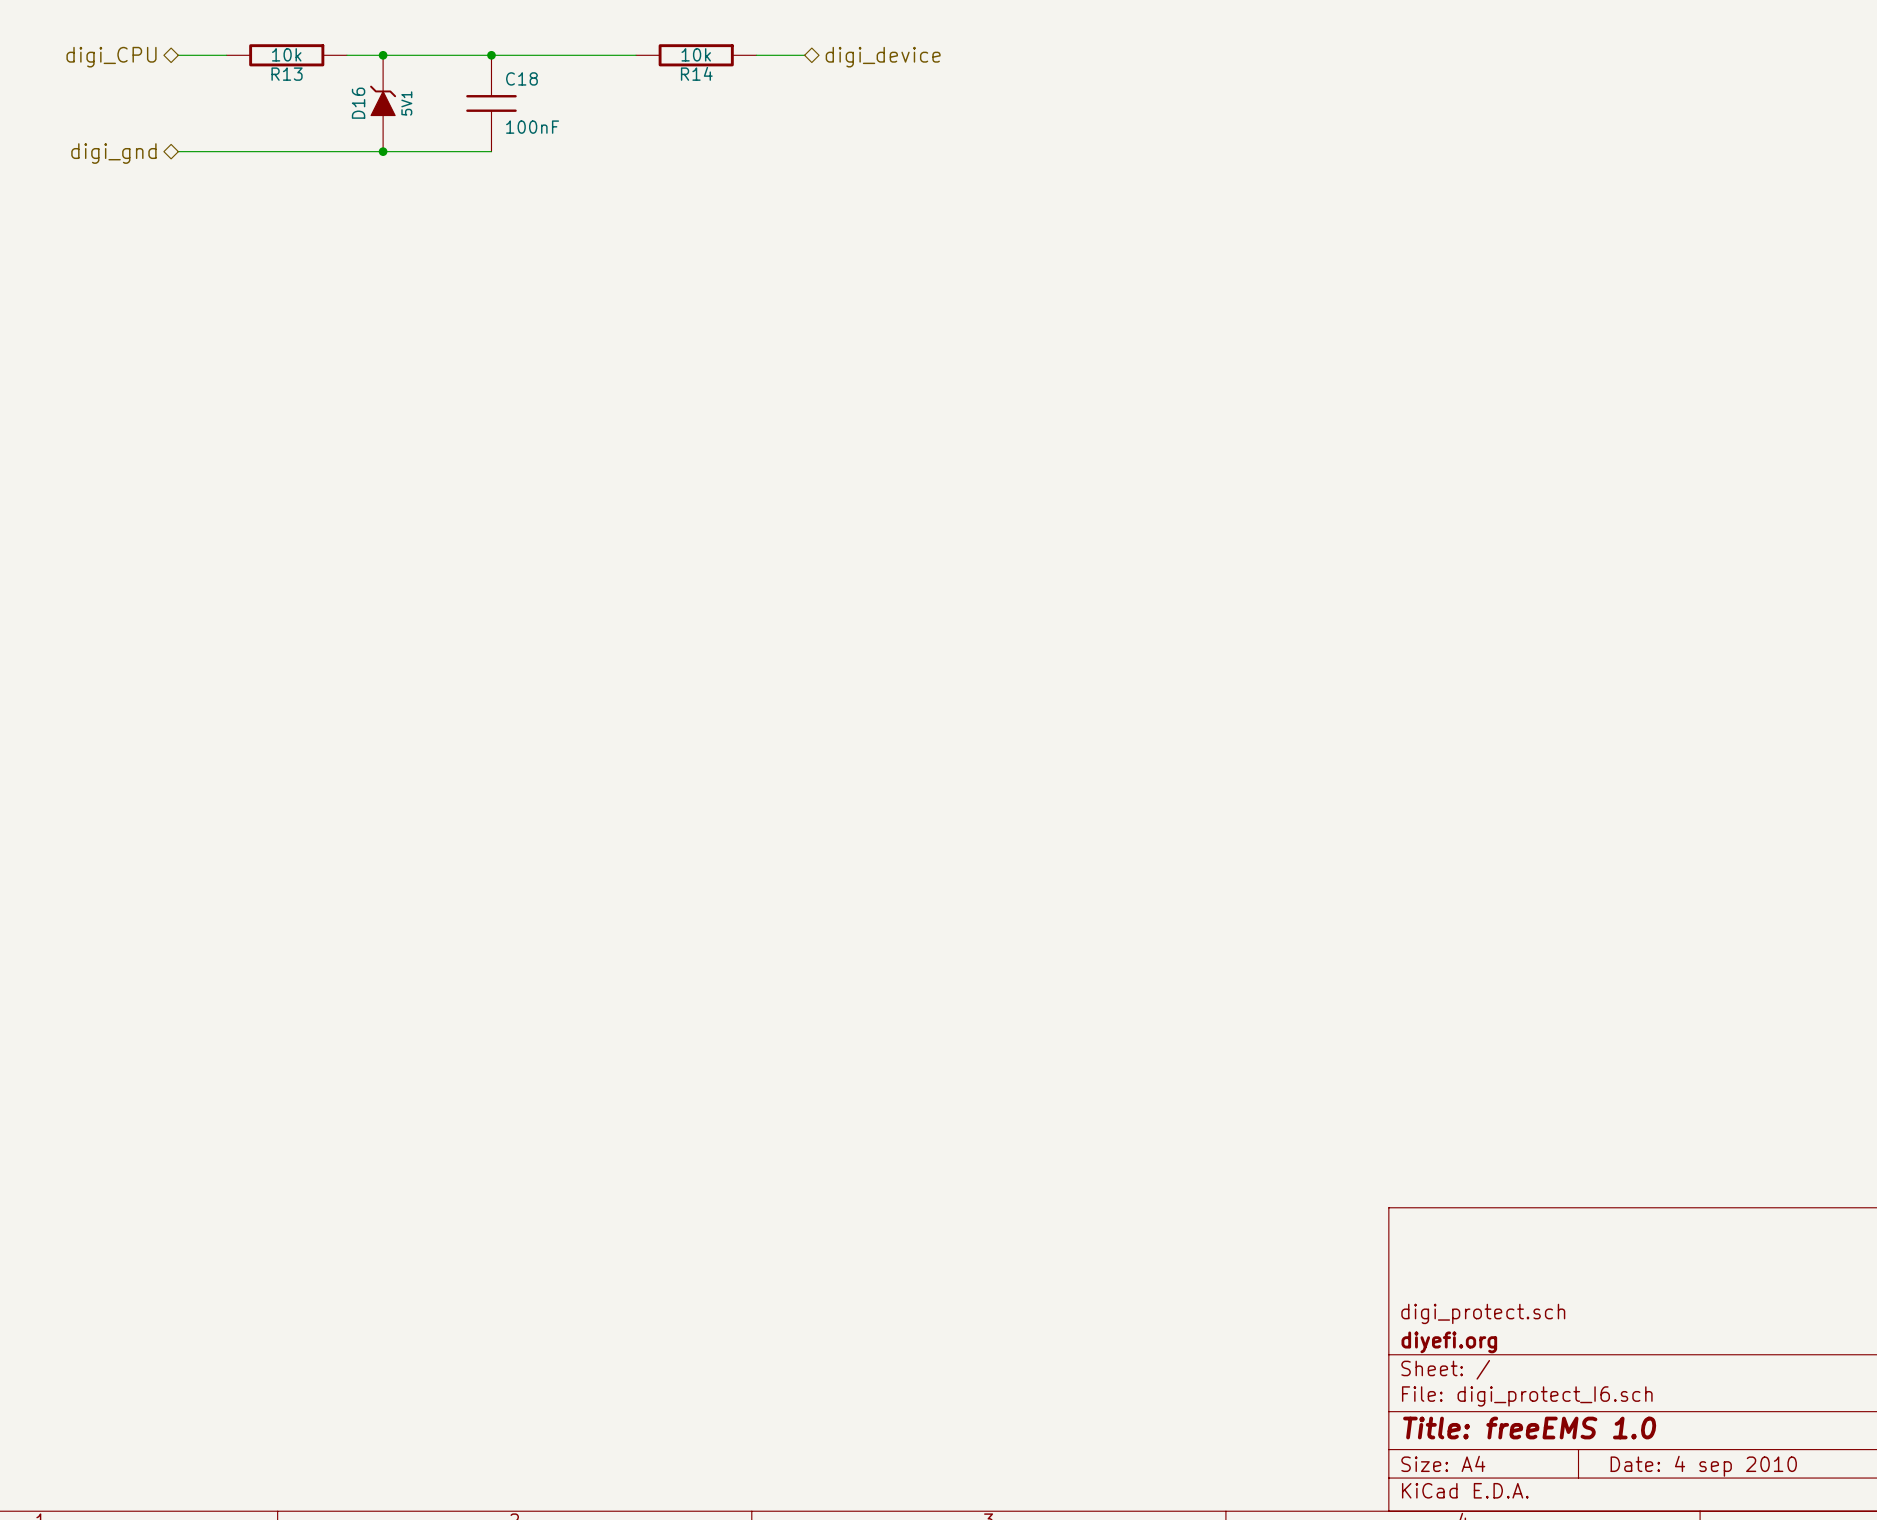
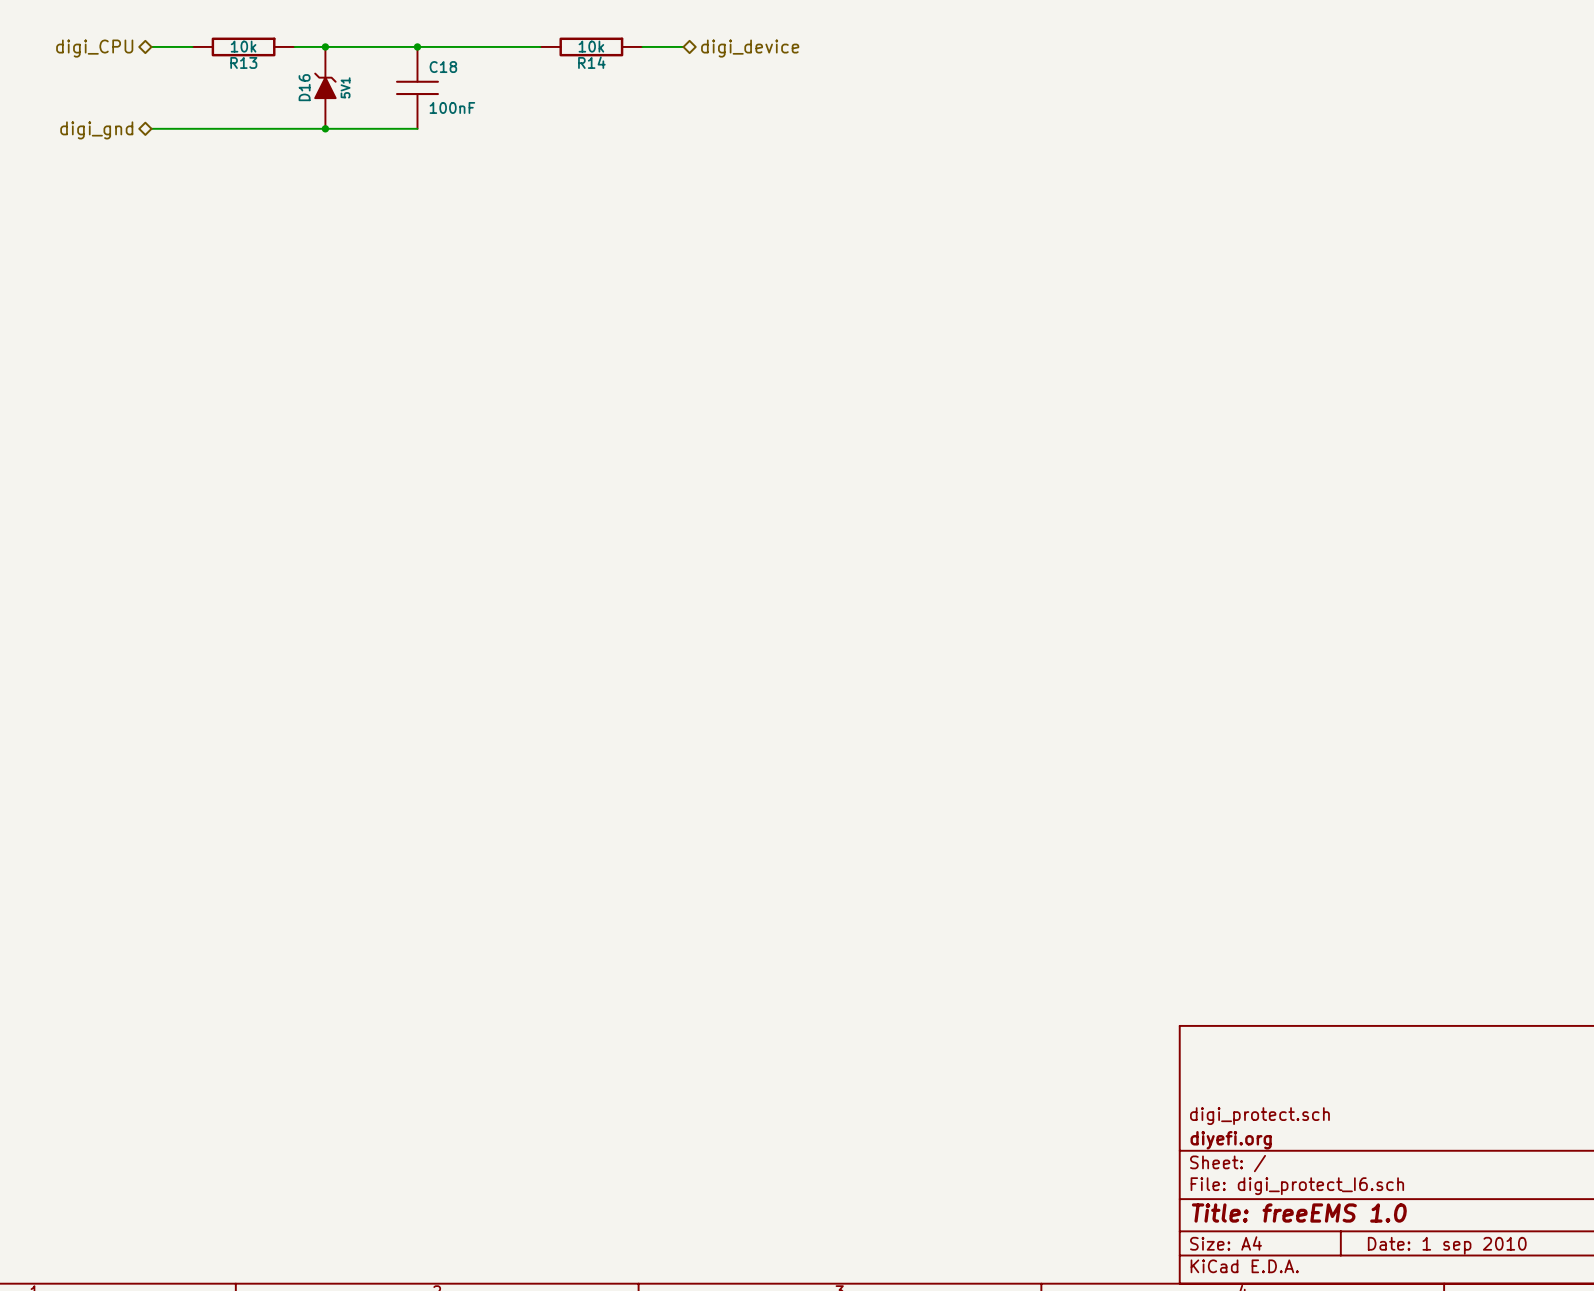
title block: Date: 4 sep 2010 (1703, 1466) -> Date: 1 sep 2010 (1447, 1245)

